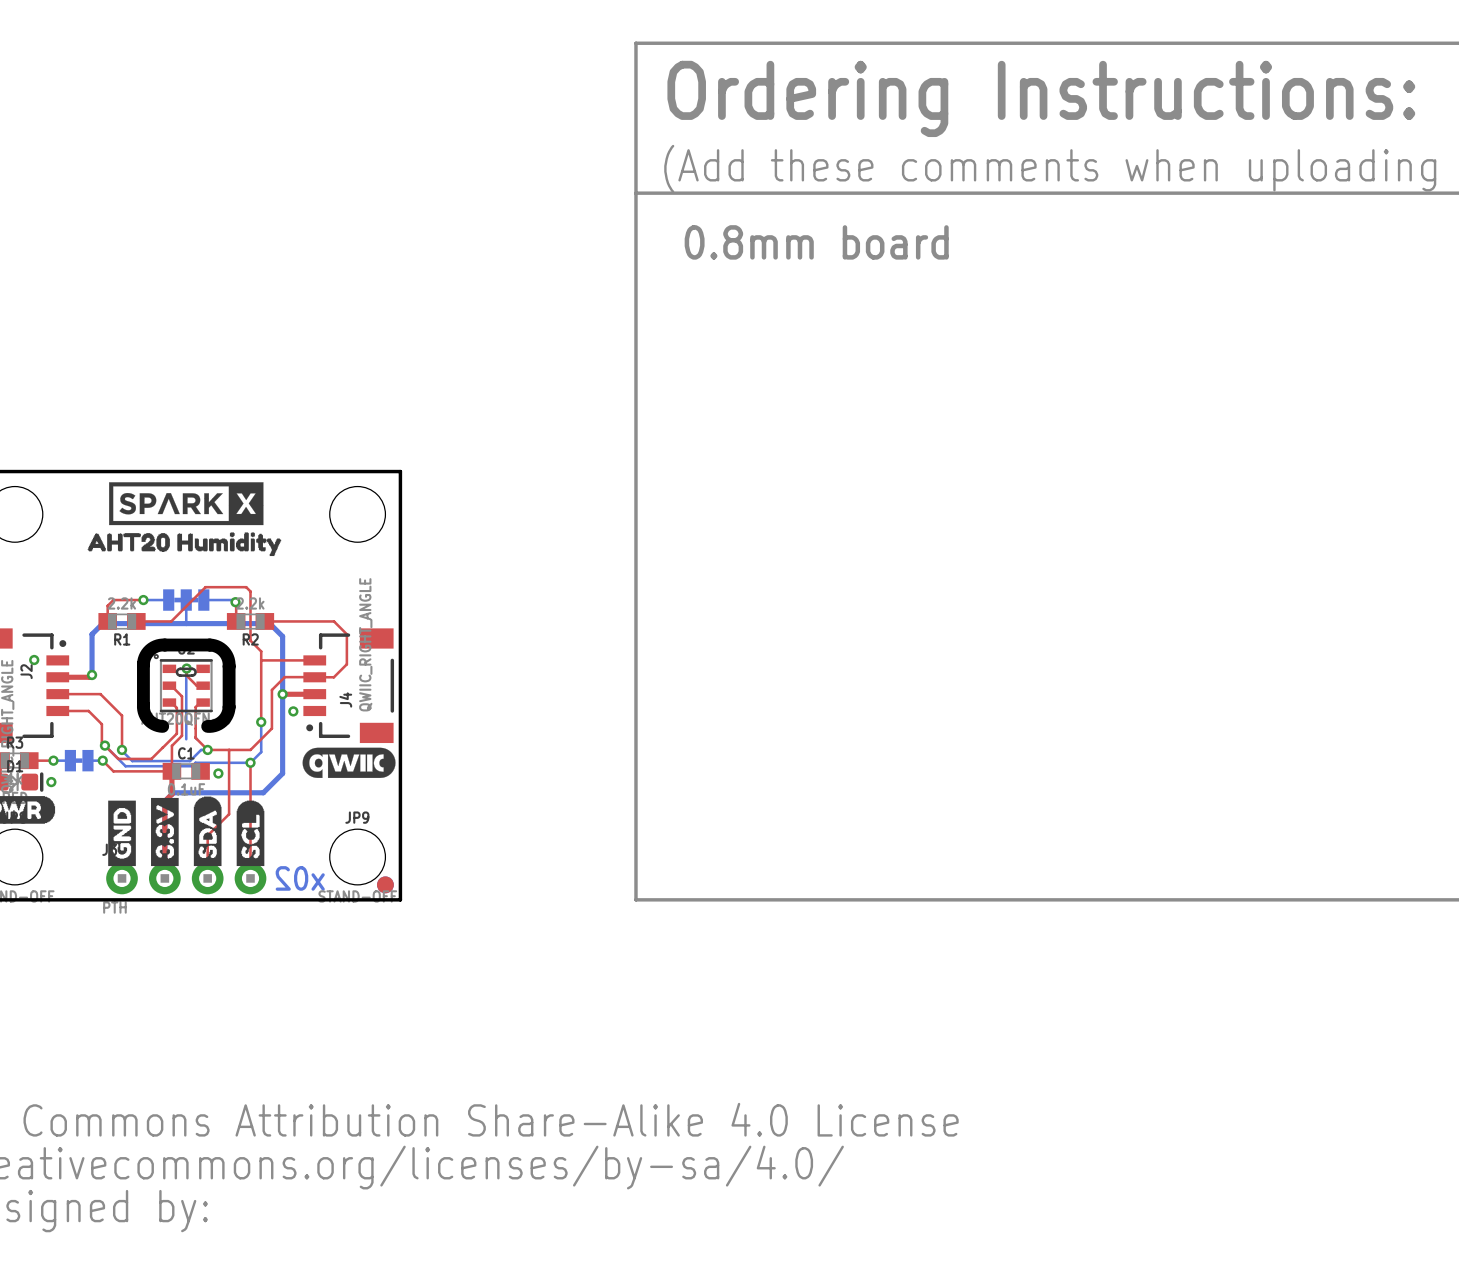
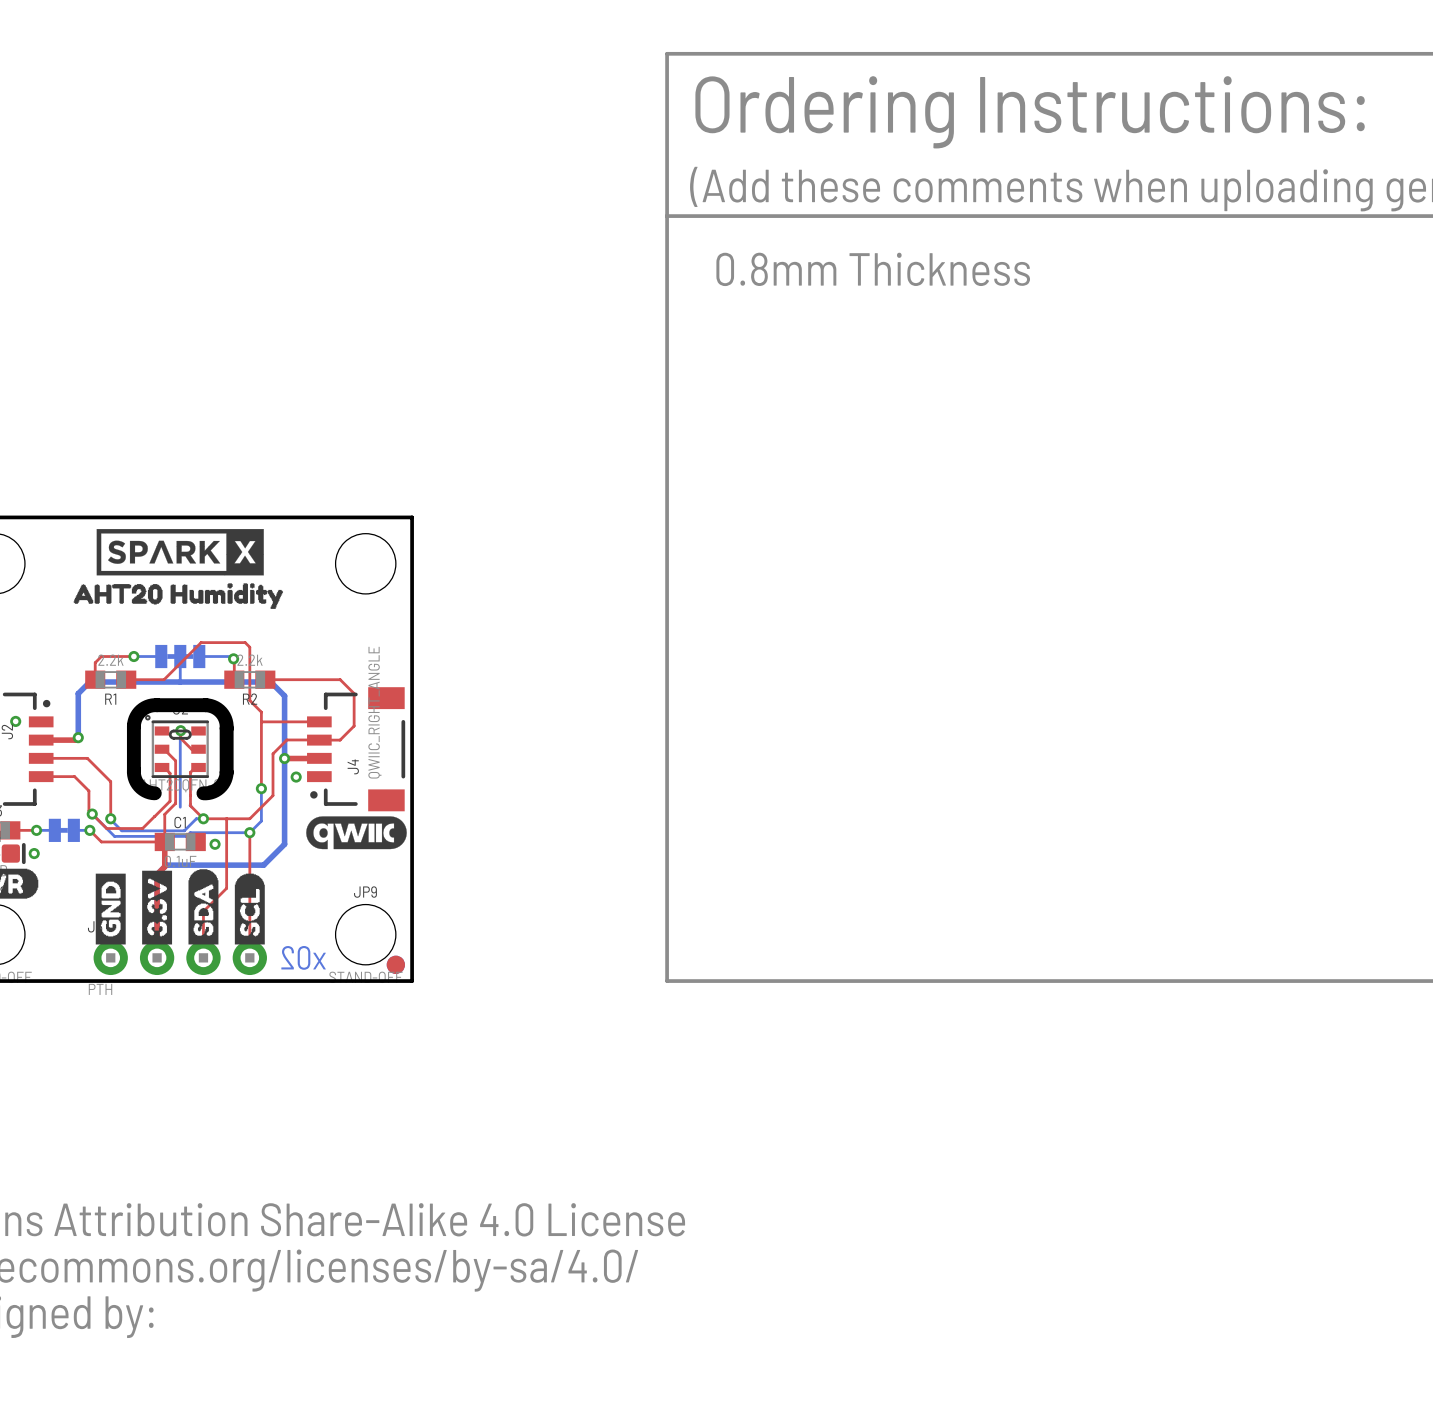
text: 0.8mm board (816, 242) -> 0.8mm Thickness (873, 269)

